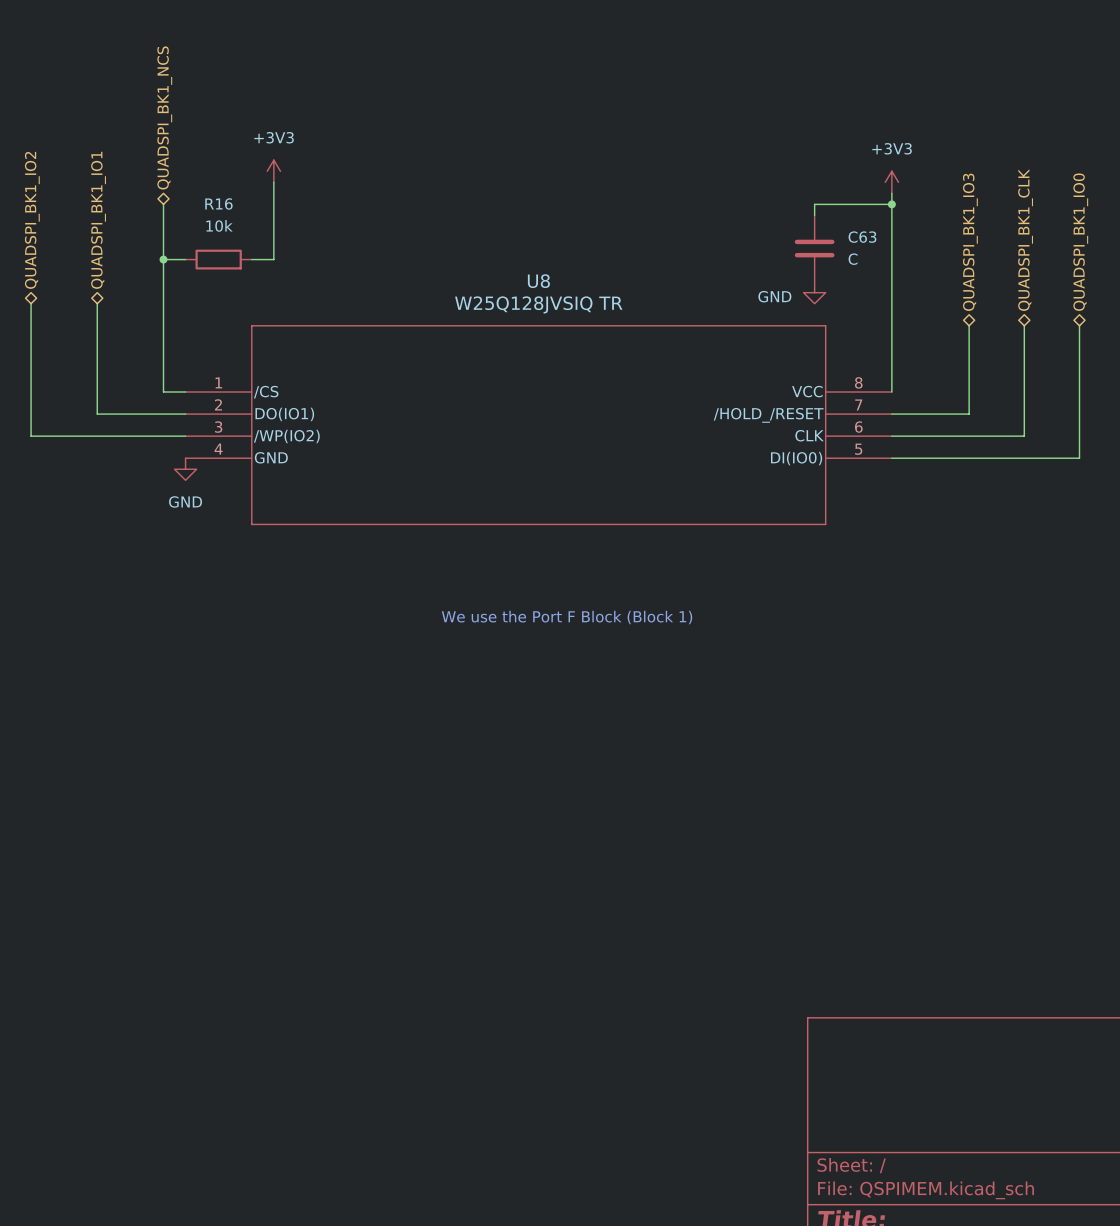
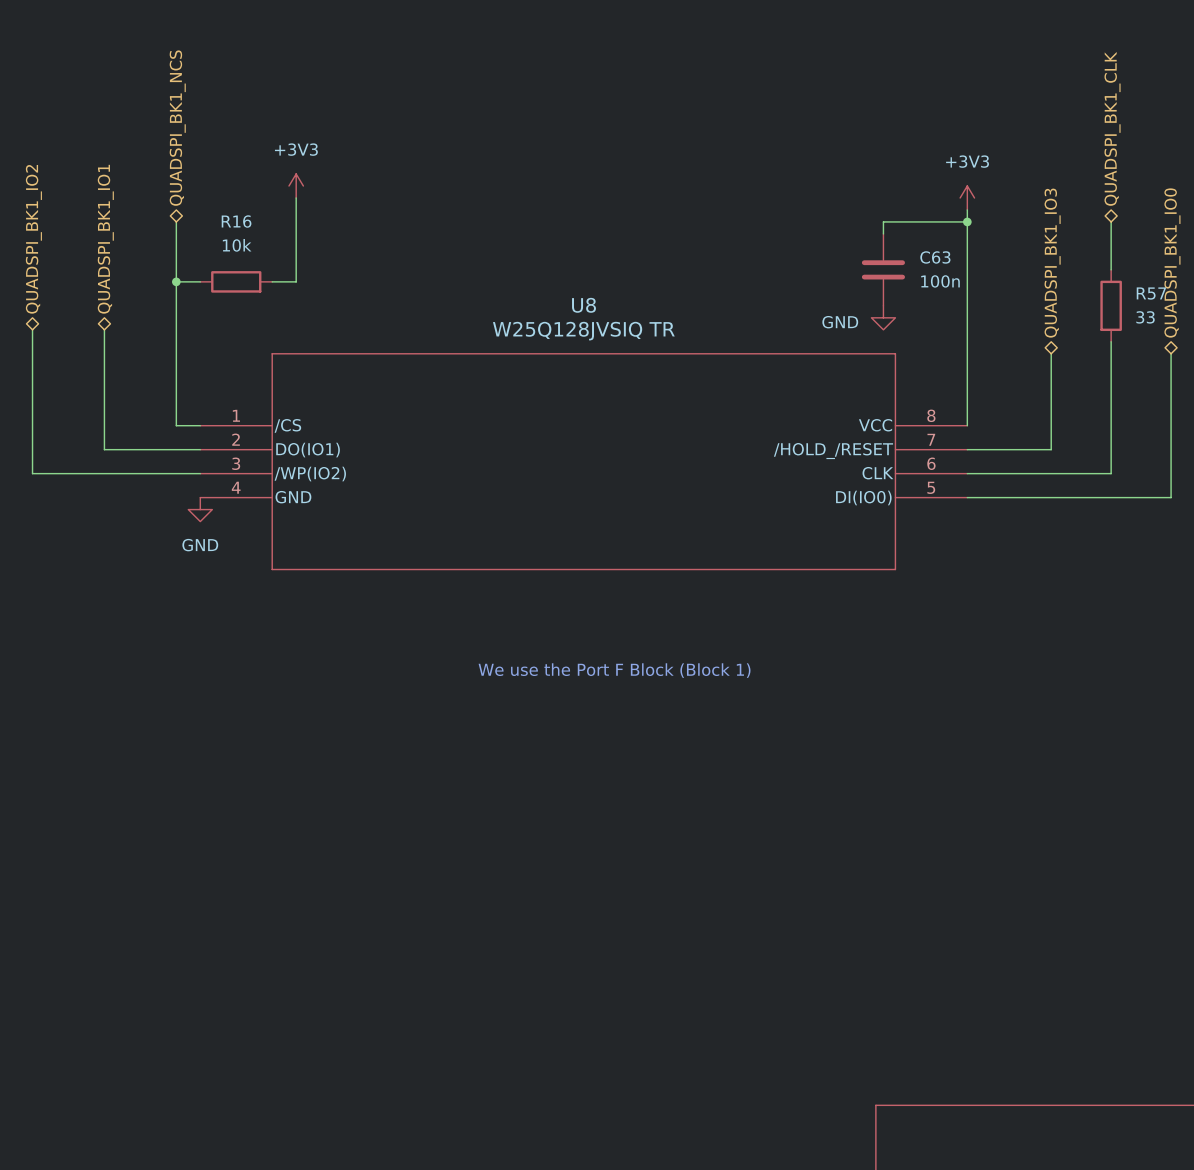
wire: none -> (1111, 221) (1111, 269)
hierarchical label position: QUADSPI_BK1_CLK (1025, 240) -> QUADSPI_BK1_CLK (1112, 128)
C63 value: C (853, 259) -> 100n (940, 281)
R57: none -> 33 (1111, 305)
wire: none -> (1111, 341) (1111, 353)

